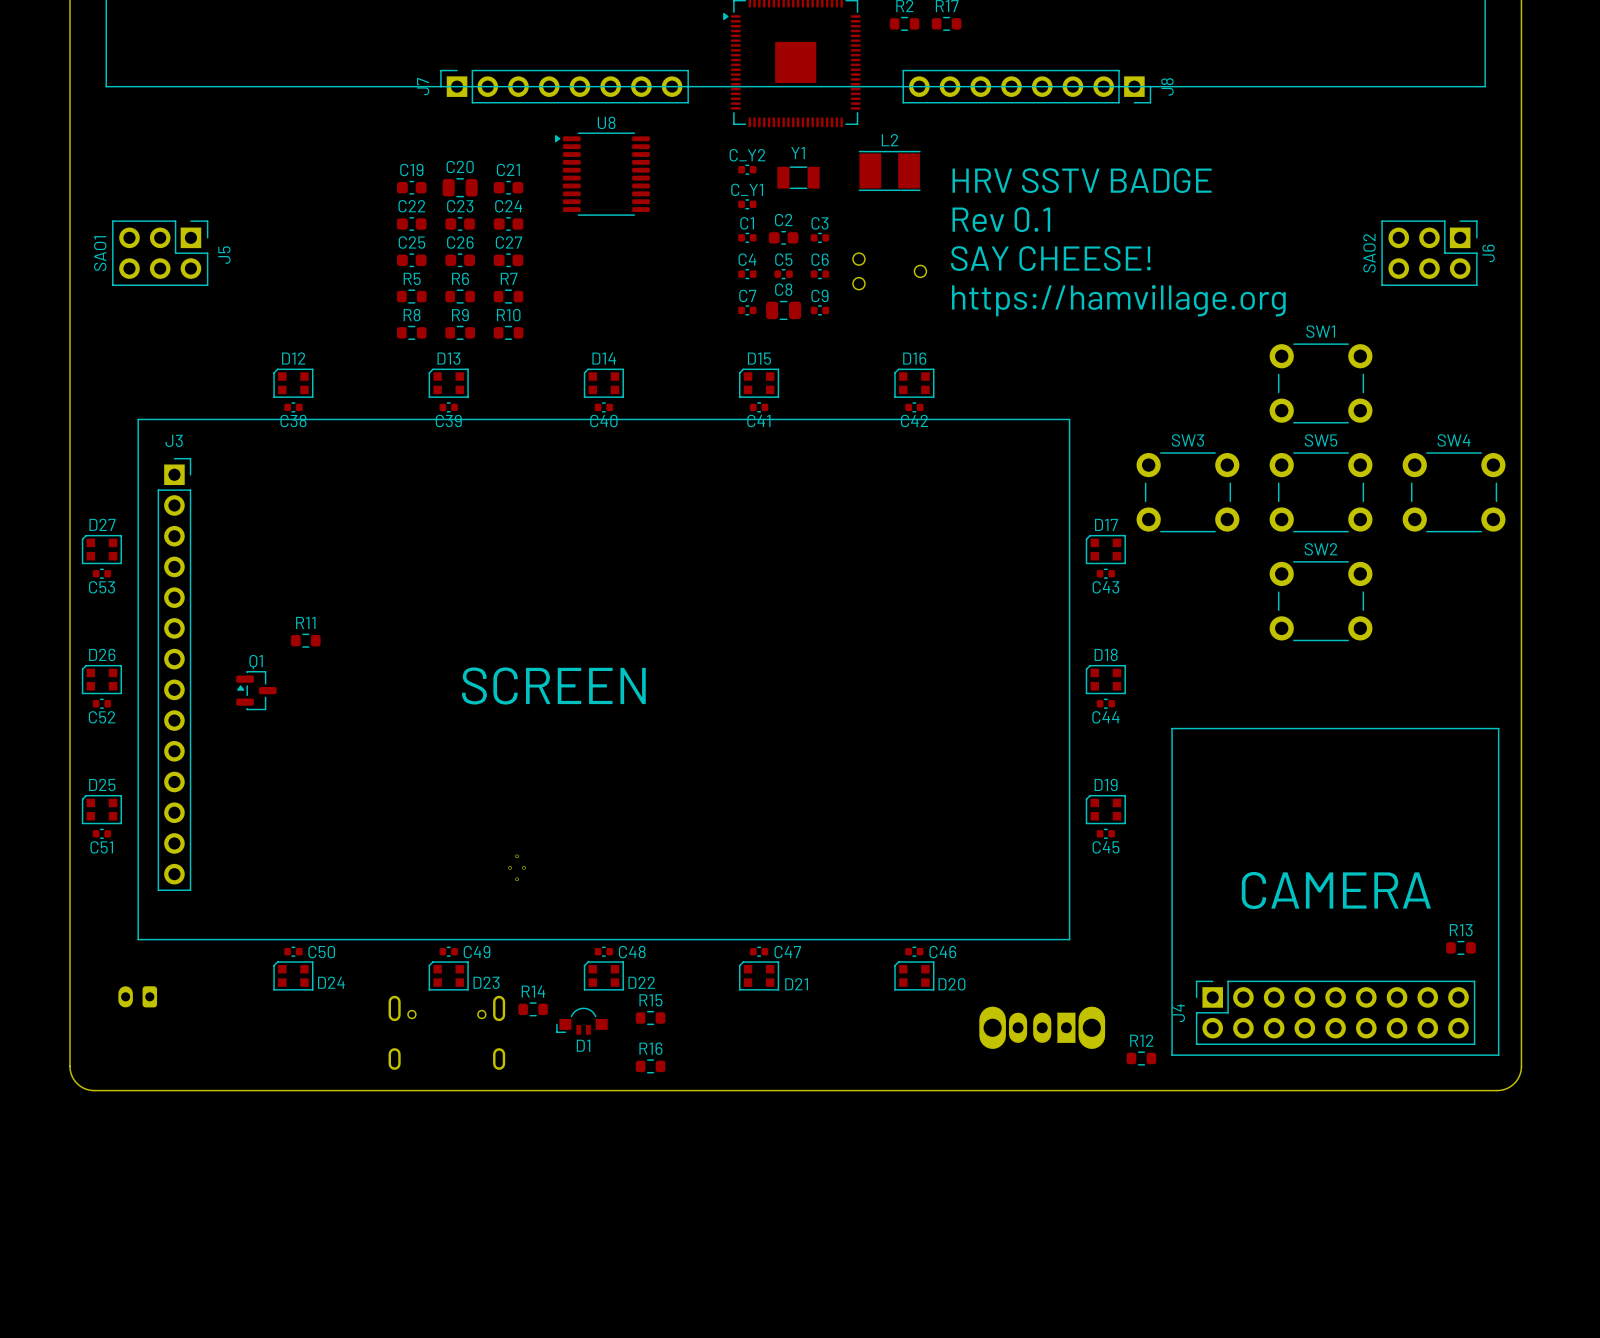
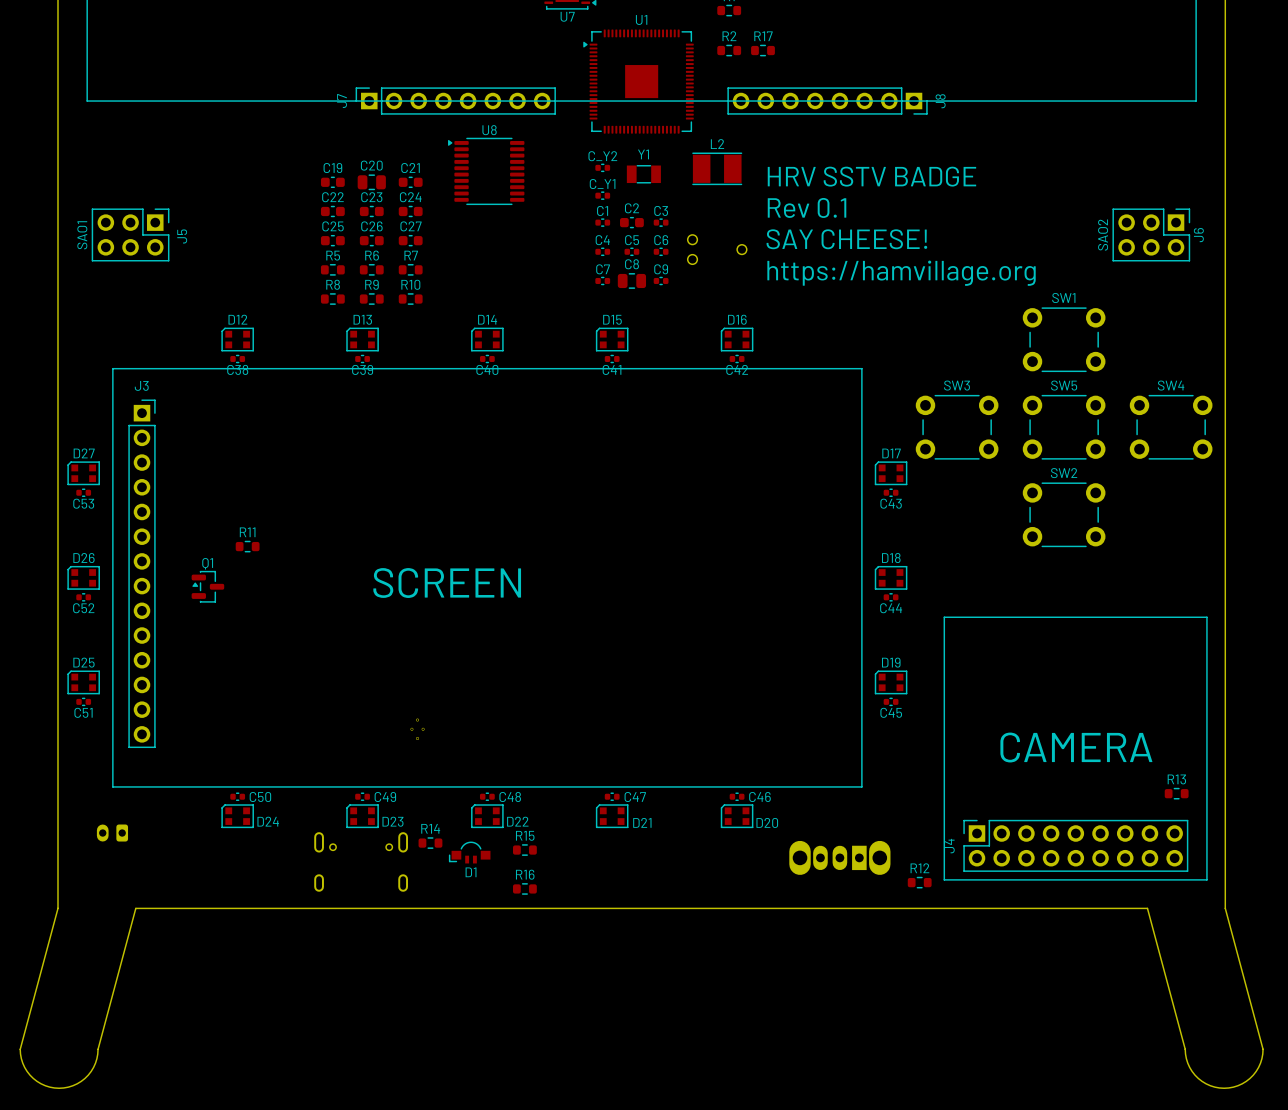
board edge: (69, 1066) (75, 1081) (88, 1089) (166, 1090) -> (57, 888) (57, 908) (20, 1049) (21, 1058) (27, 1071) (37, 1081) (49, 1087) (63, 1087) (72, 1085) (84, 1078) (93, 1067) (135, 908)
board edge: (1521, 1066) (1516, 1081) (1502, 1089) (1424, 1090) -> (1225, 888) (1225, 908) (1263, 1049) (1261, 1058) (1256, 1071) (1246, 1081) (1233, 1087) (1219, 1087) (1206, 1083) (1195, 1075) (1189, 1067) (1147, 908)

